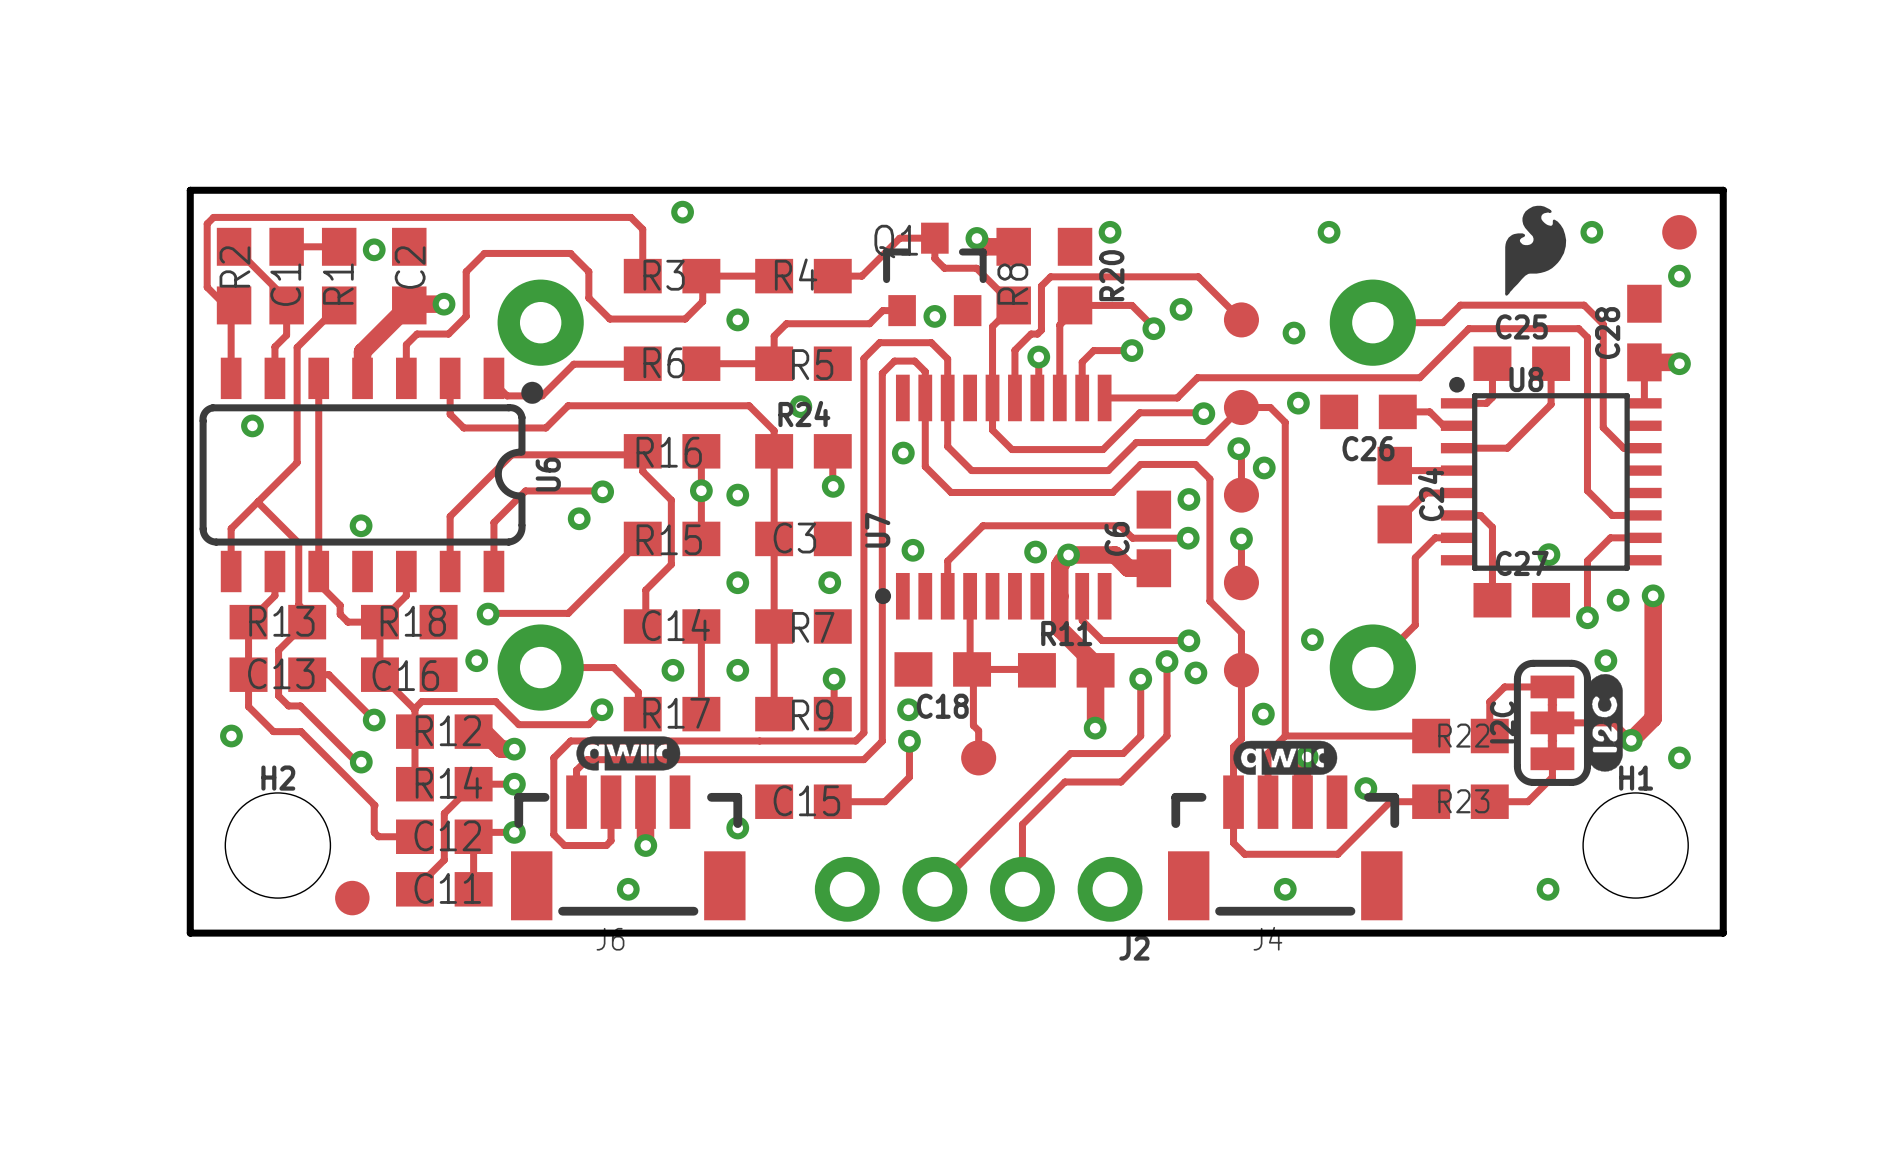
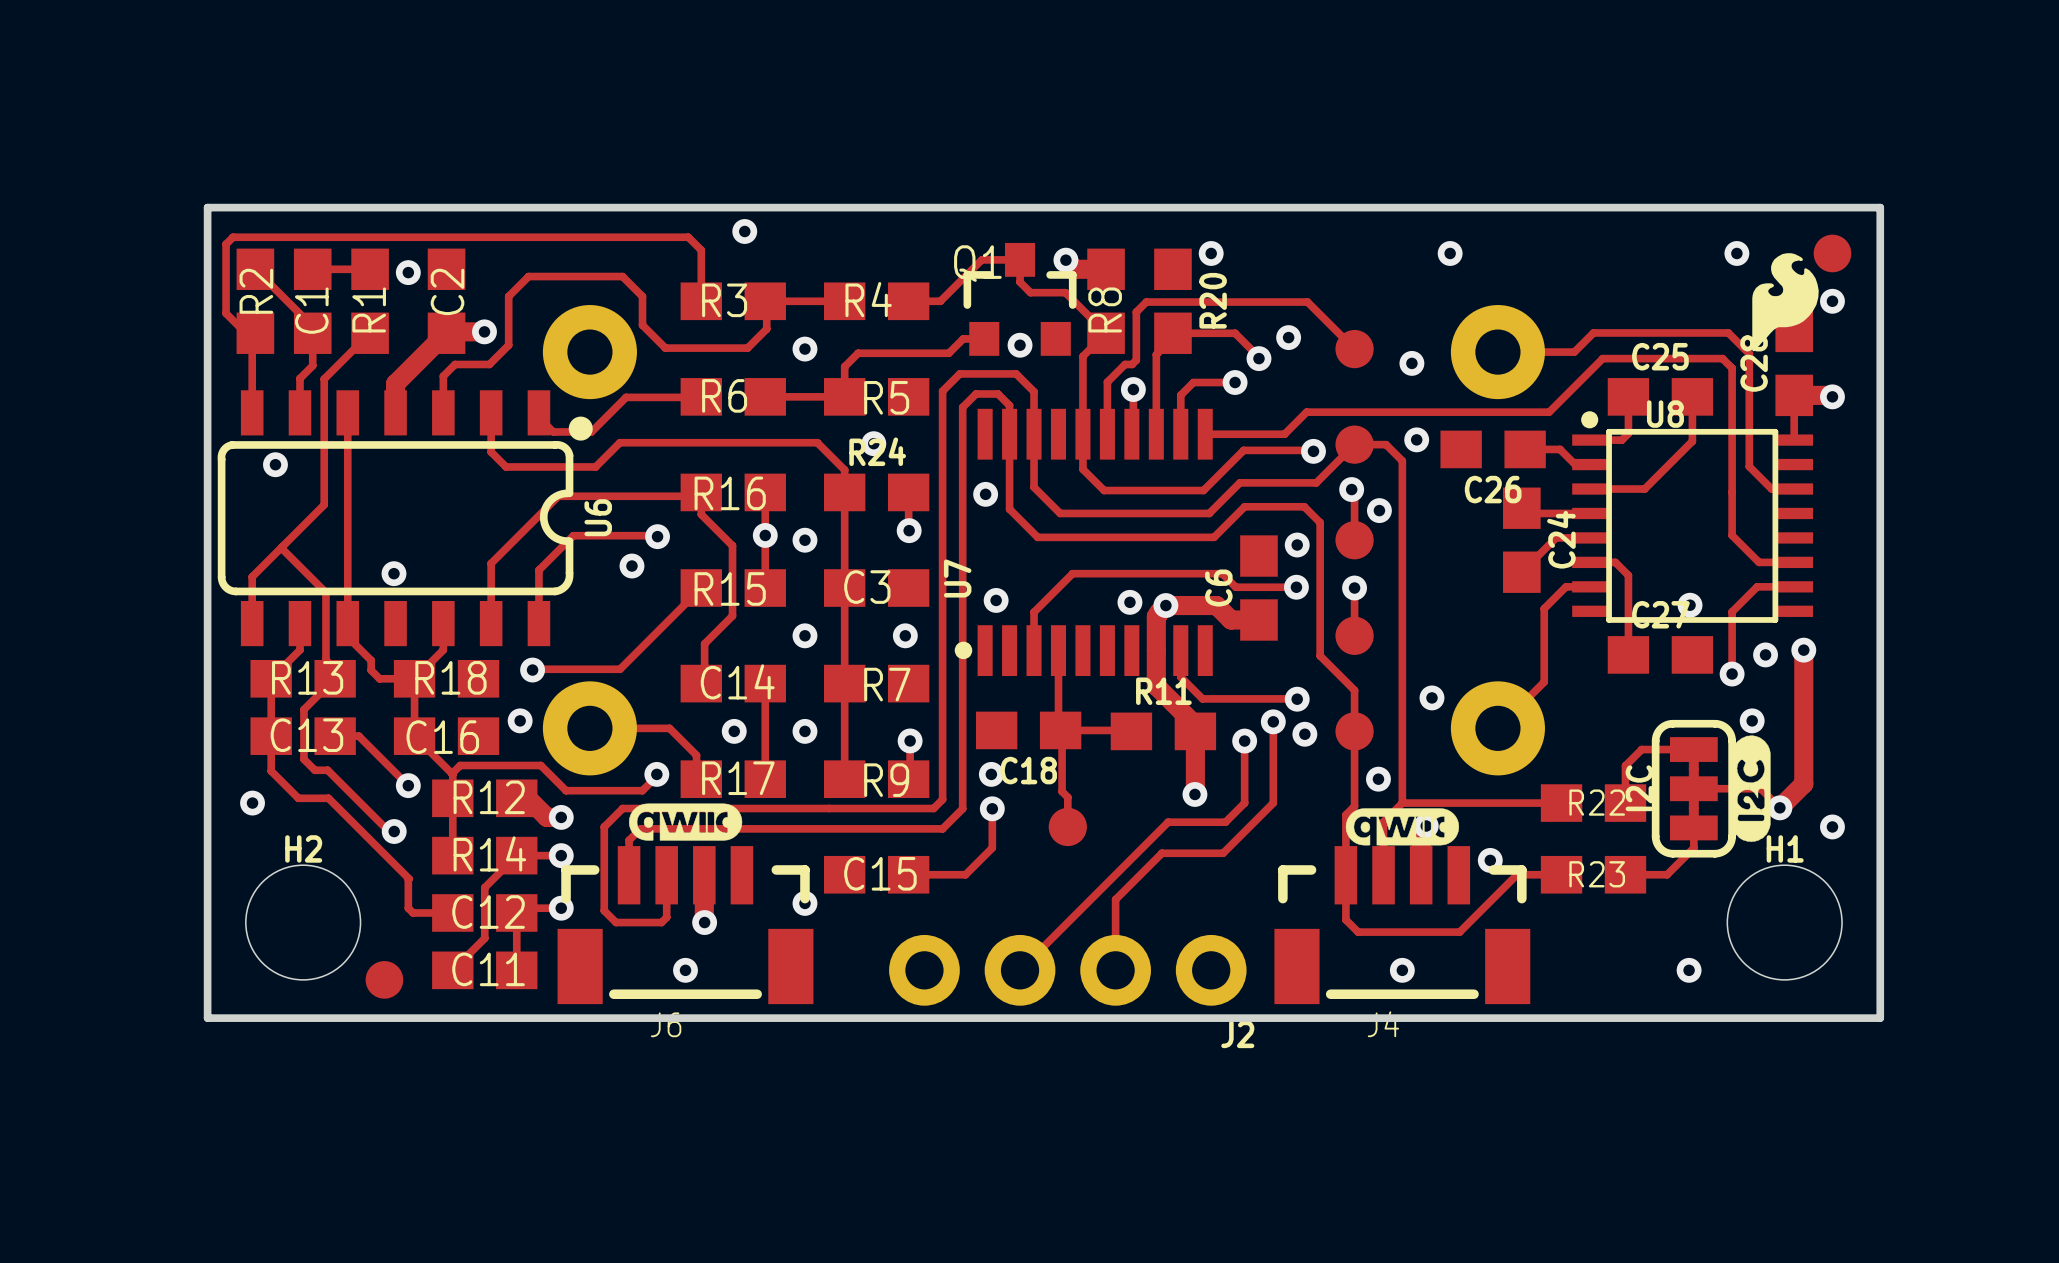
drawing position: (1535, 250) -> (1785, 302)

